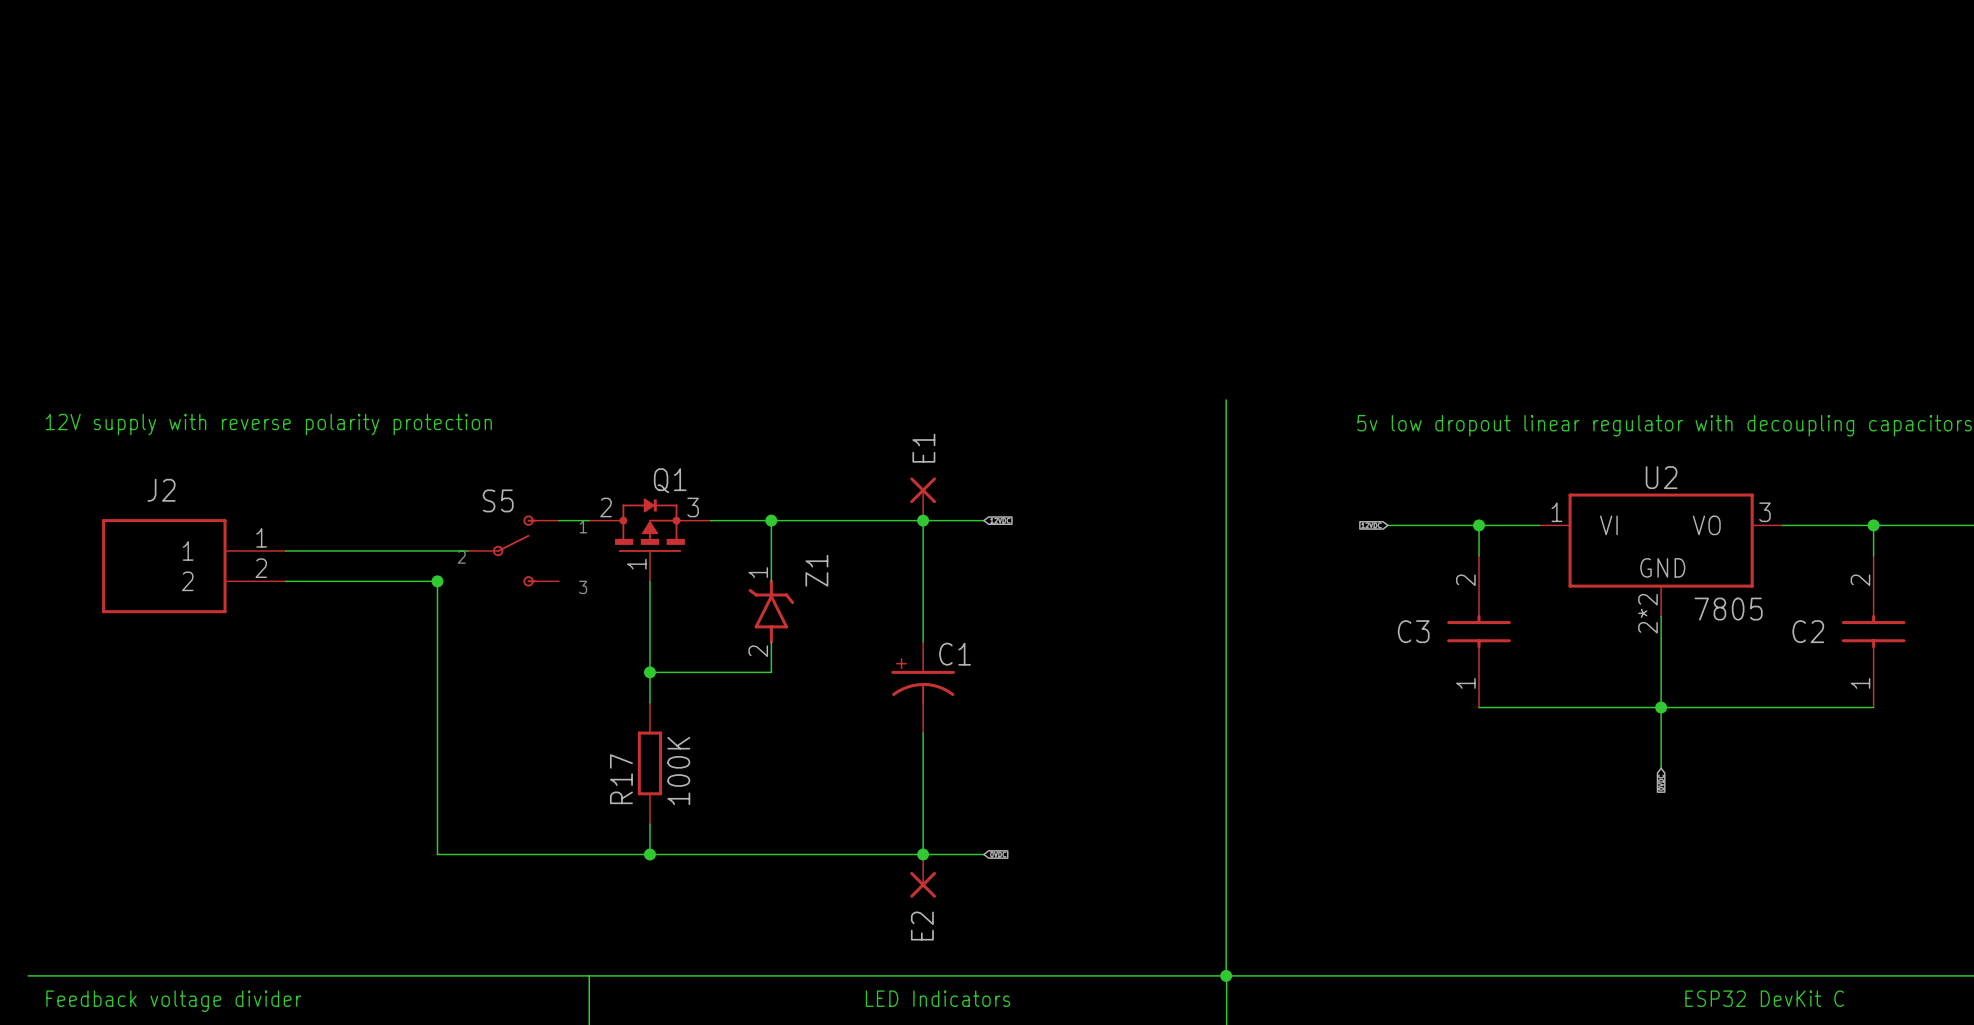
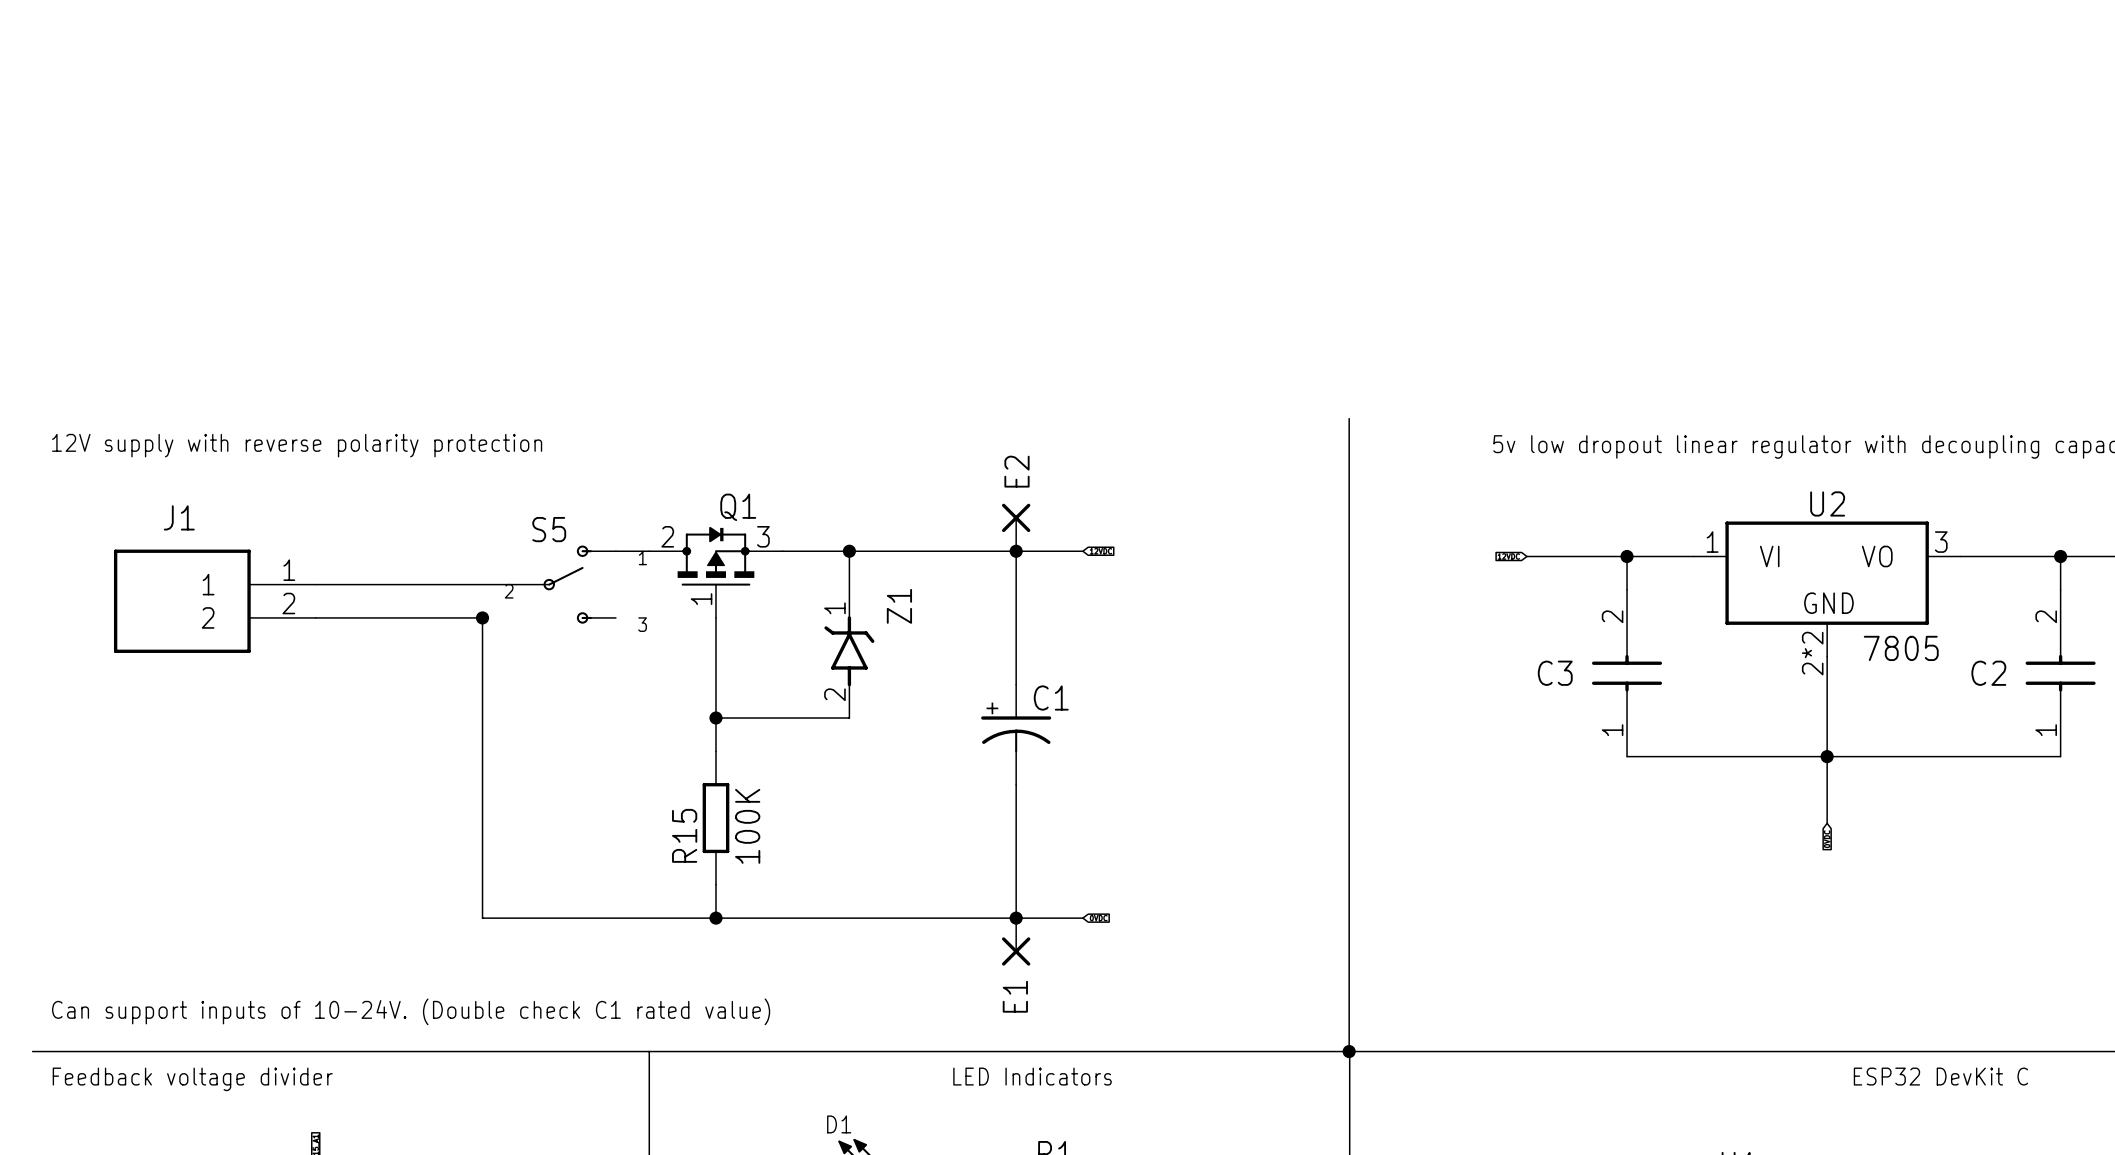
E1 name: E1 (923, 448) -> E2 (1017, 471)
J2 name: J2 (161, 490) -> J1 (179, 517)
R17 name: R17 (621, 779) -> R15 (684, 835)
E2 name: E2 (922, 926) -> E1 (1015, 996)
text: none -> Can support inputs of 10-24V. (Double check C1 rated value) (411, 1011)

